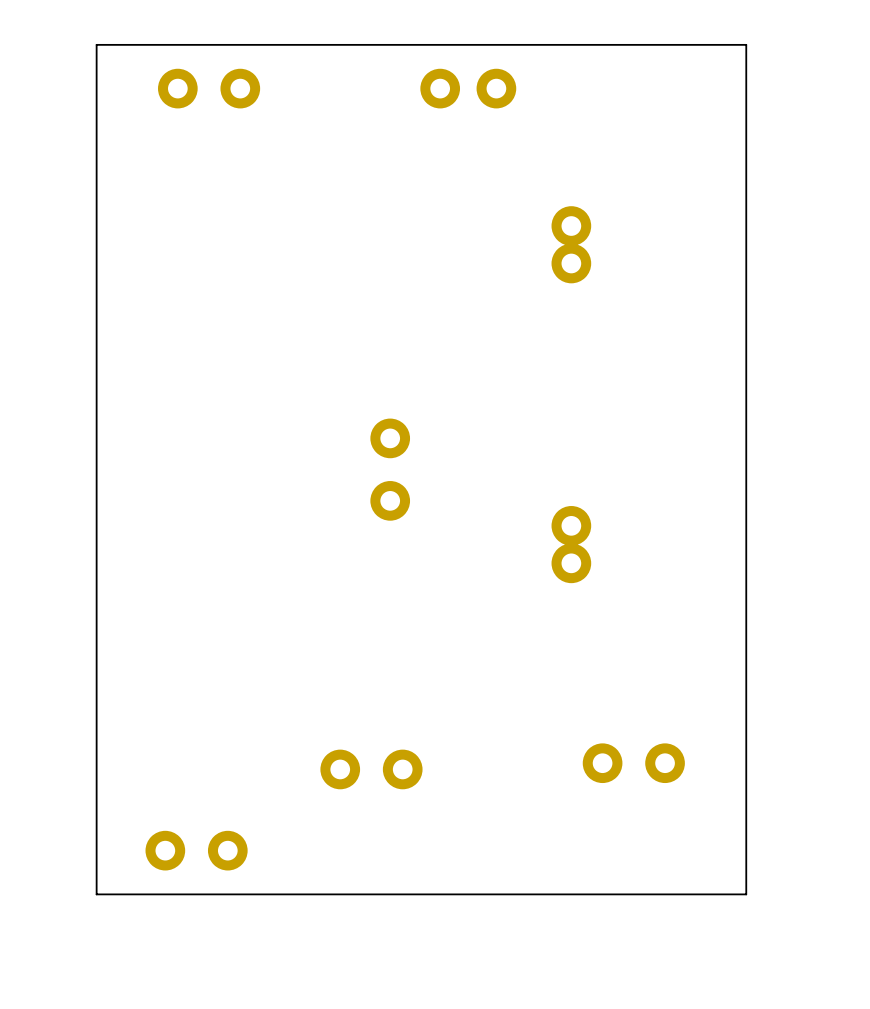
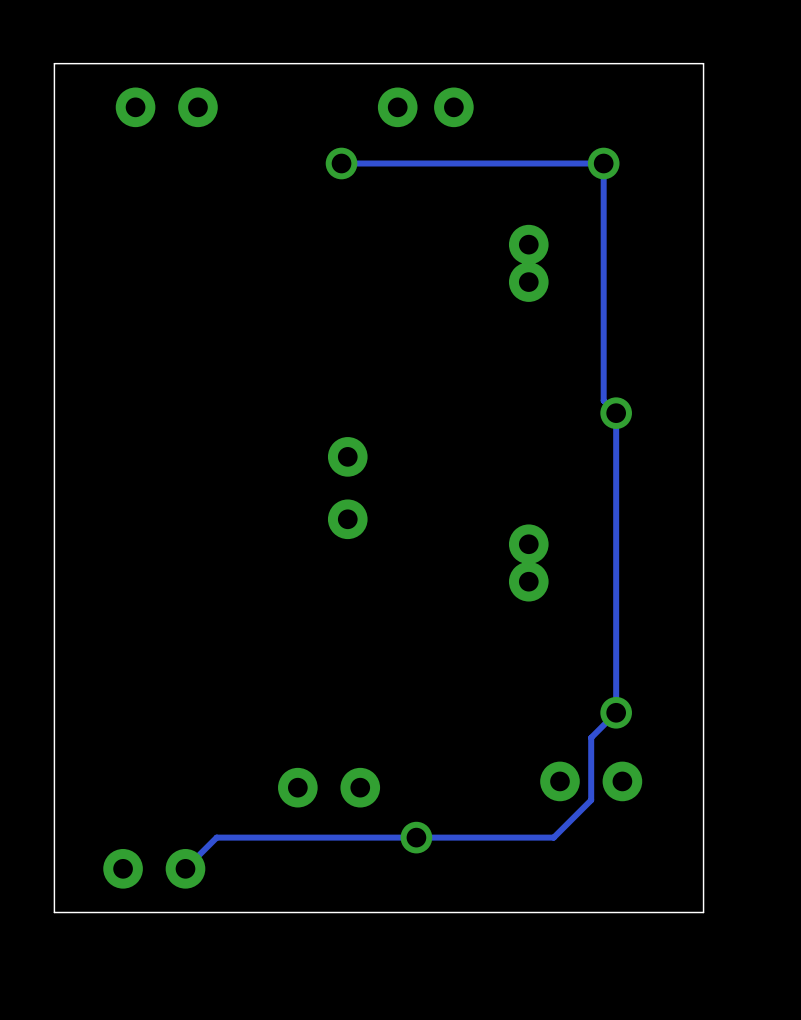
track: none -> (341, 163) (603, 163) (603, 400) (616, 413) (616, 712) (591, 737) (591, 800) (553, 837) (216, 837) (185, 868)
via: none -> (341, 163)
via: none -> (603, 163)
via: none -> (616, 413)
via: none -> (616, 712)
via: none -> (416, 837)

